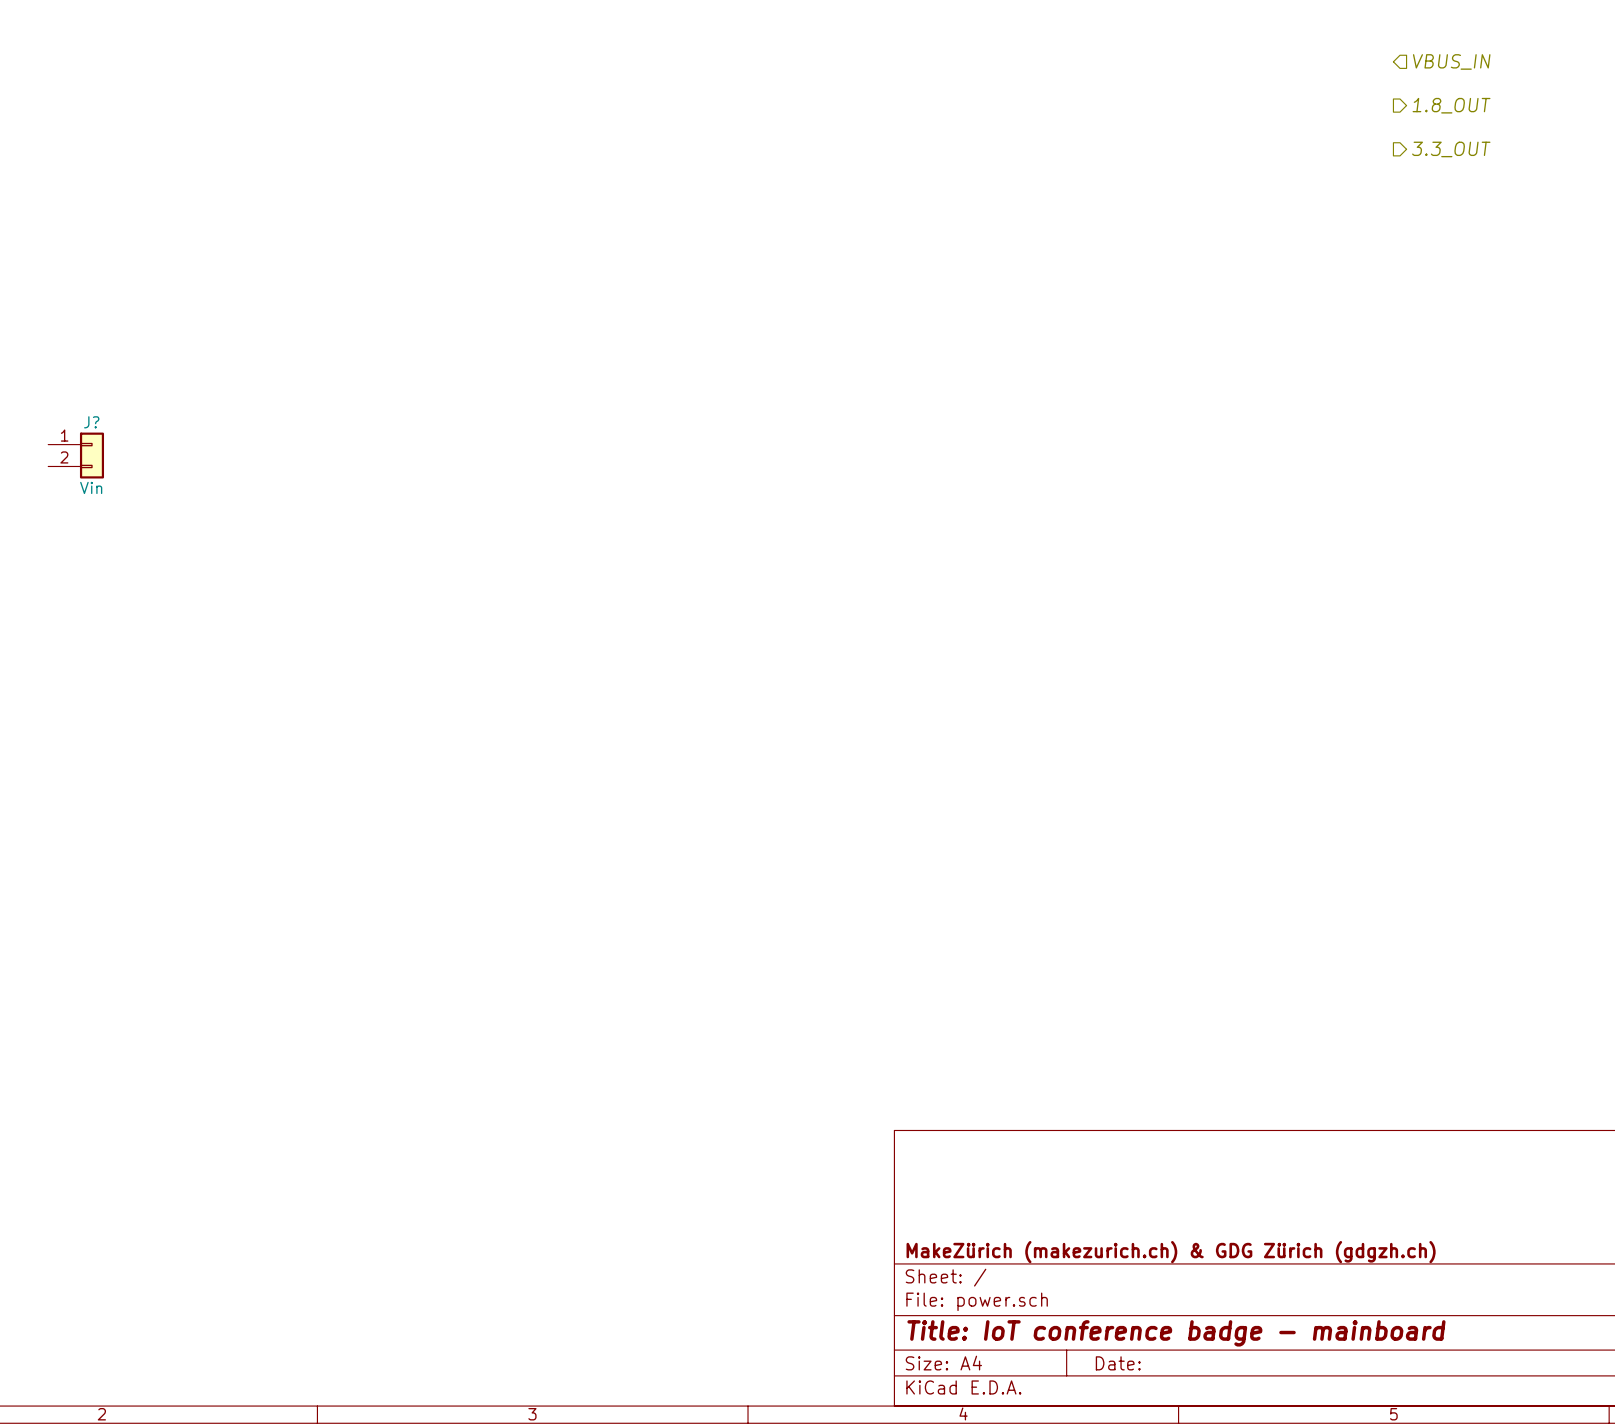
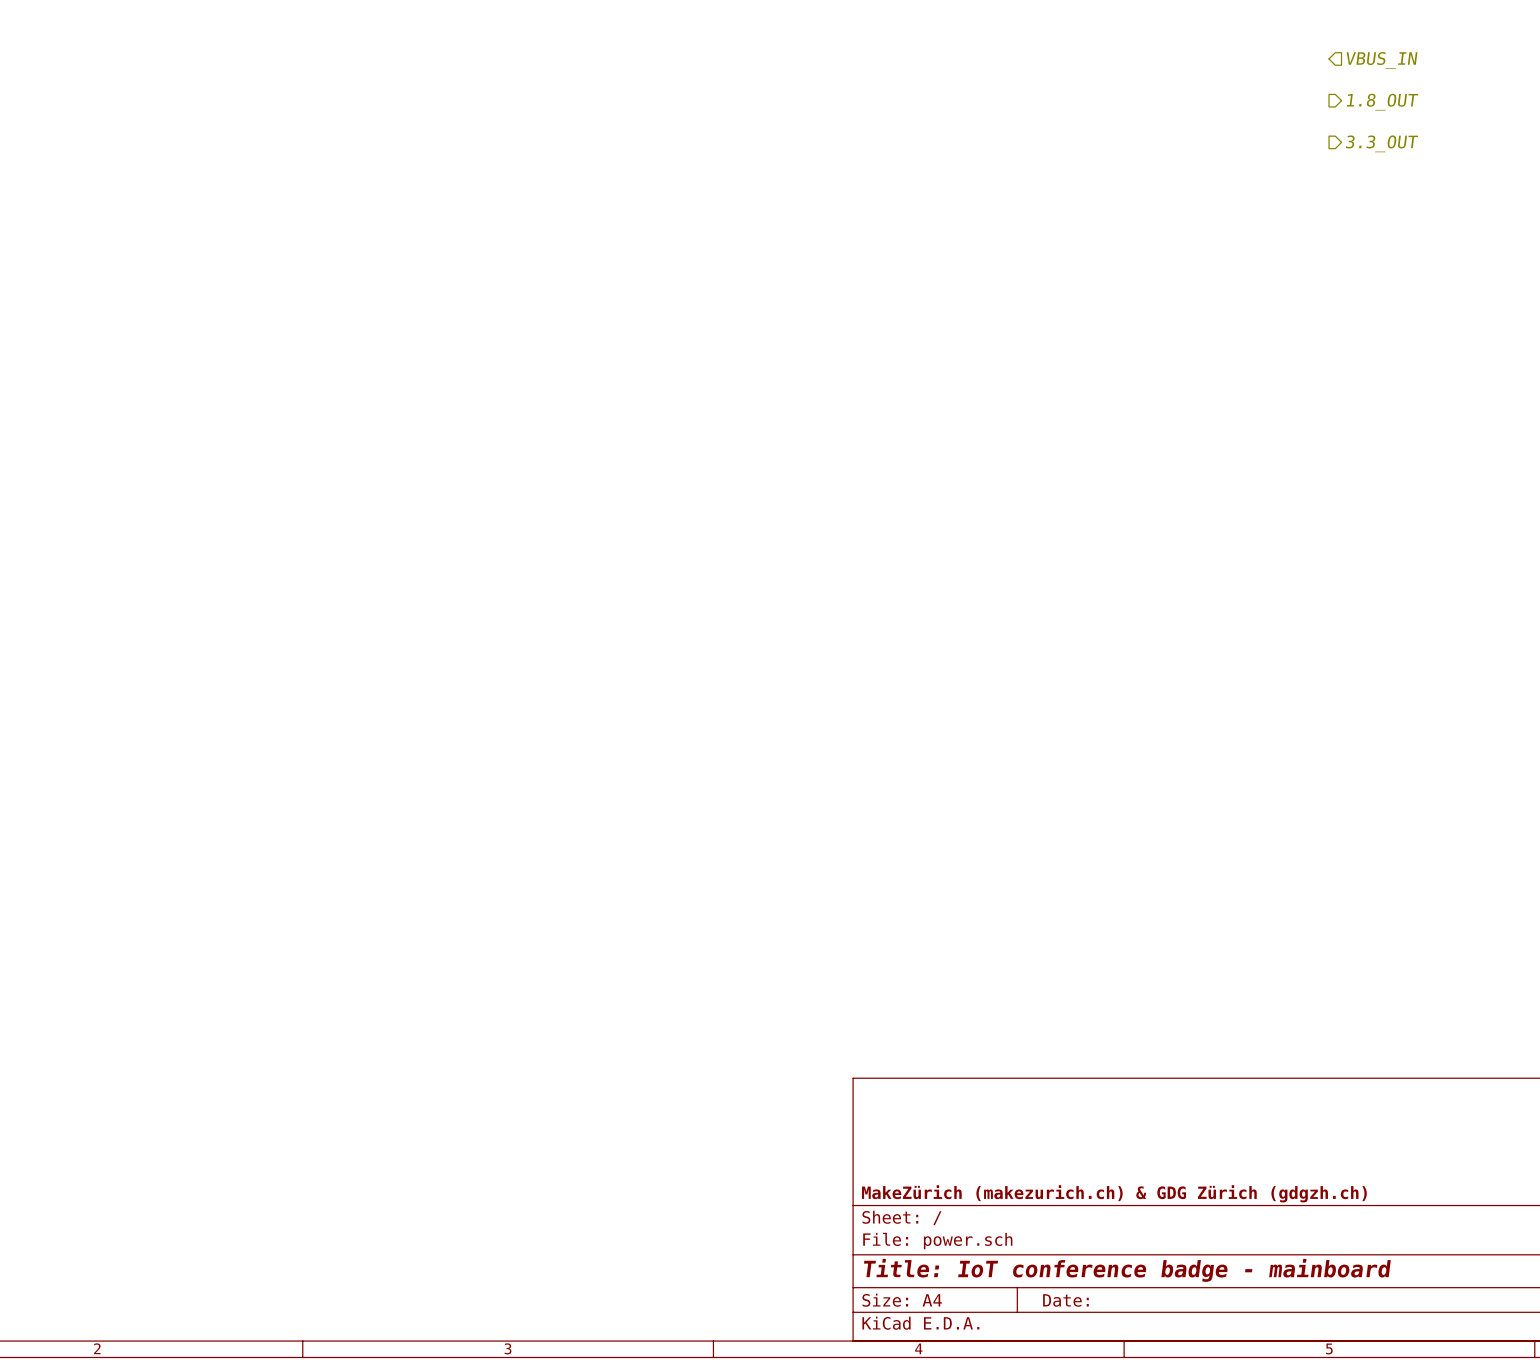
J?: Vin (76, 455) -> none

